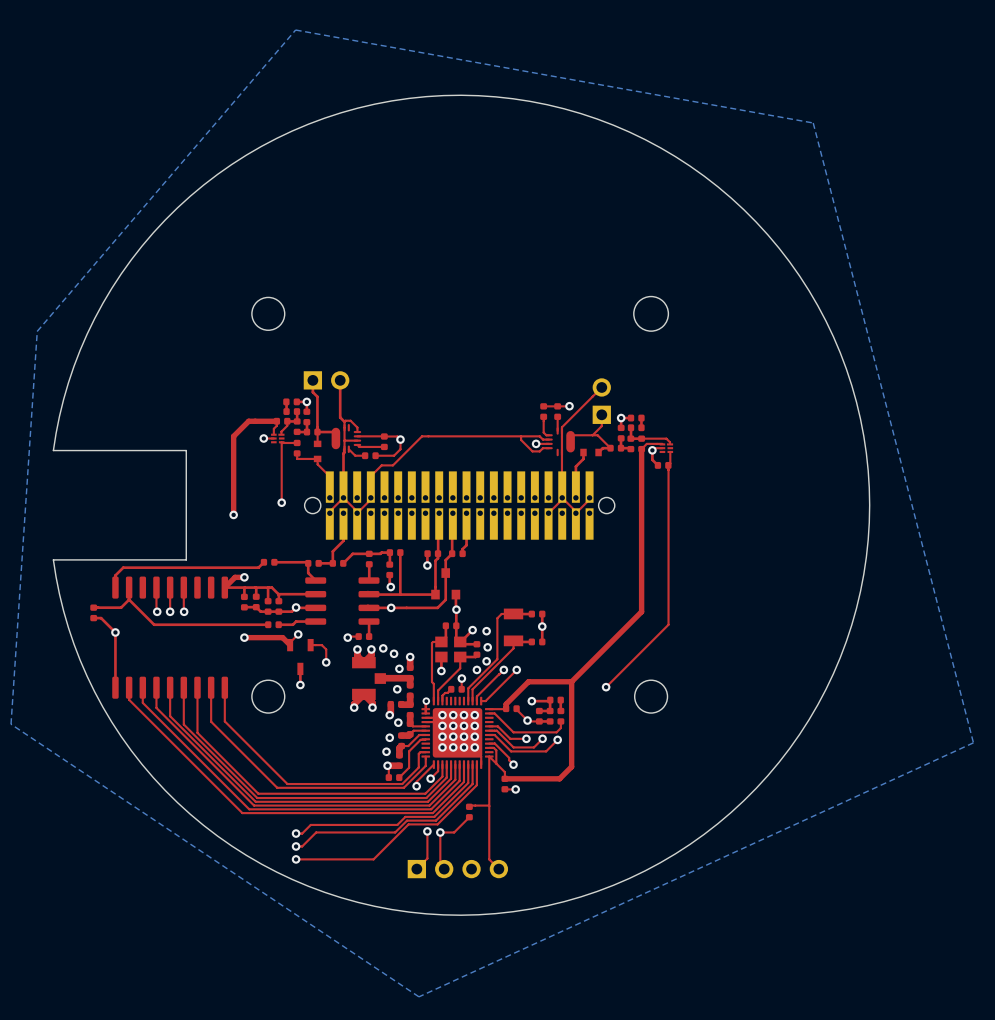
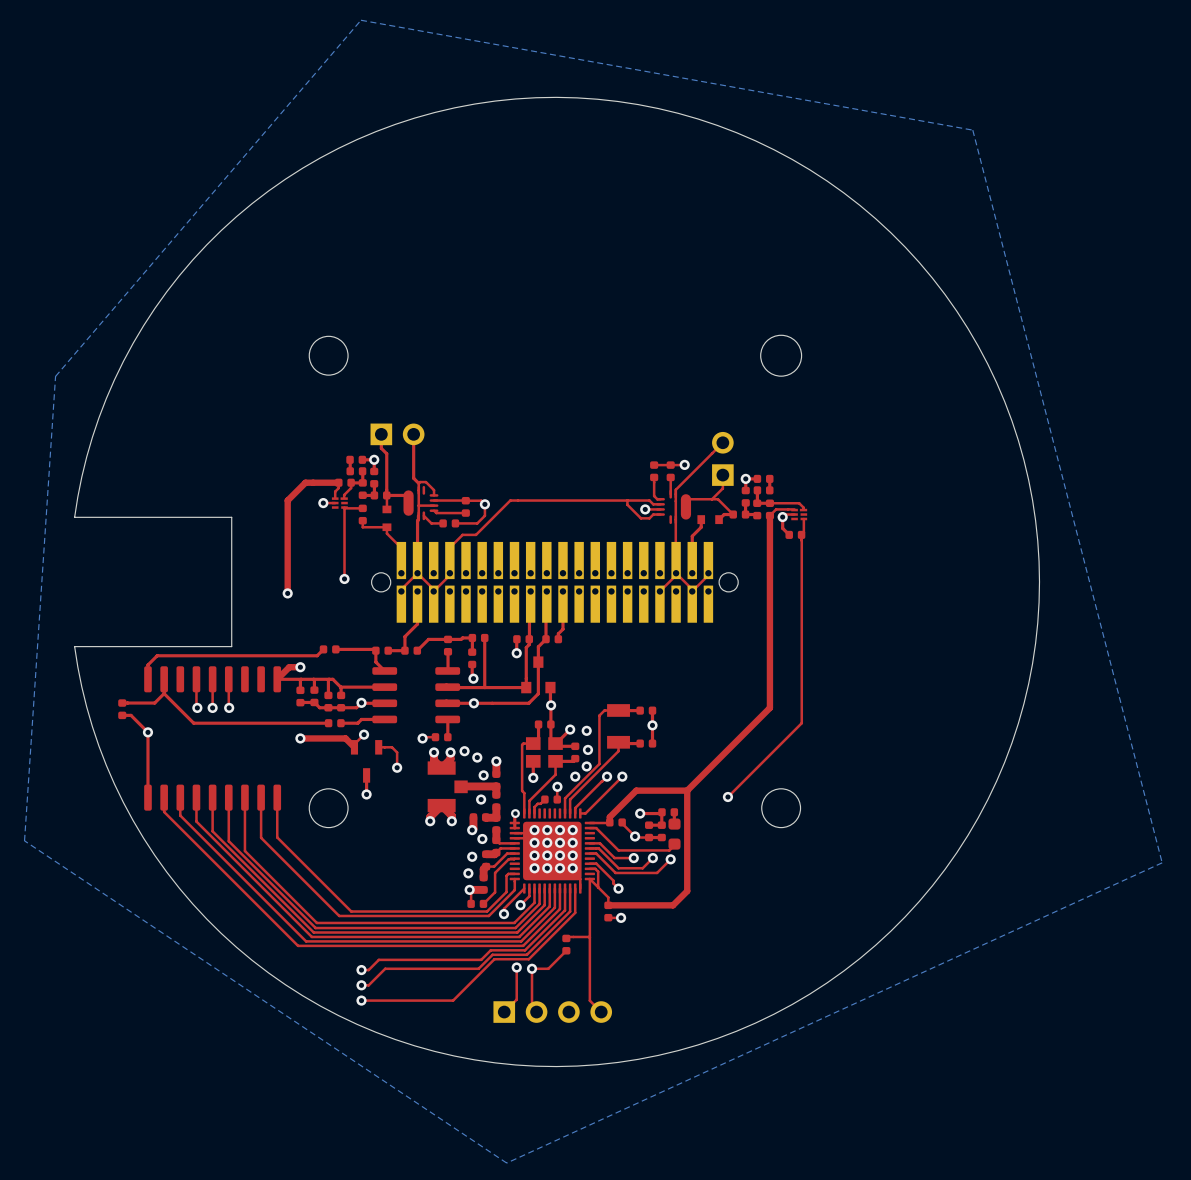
part footprint: [557, 707, 565, 725] -> [668, 818, 681, 850]
top track: (560, 721) (560, 728) -> none

